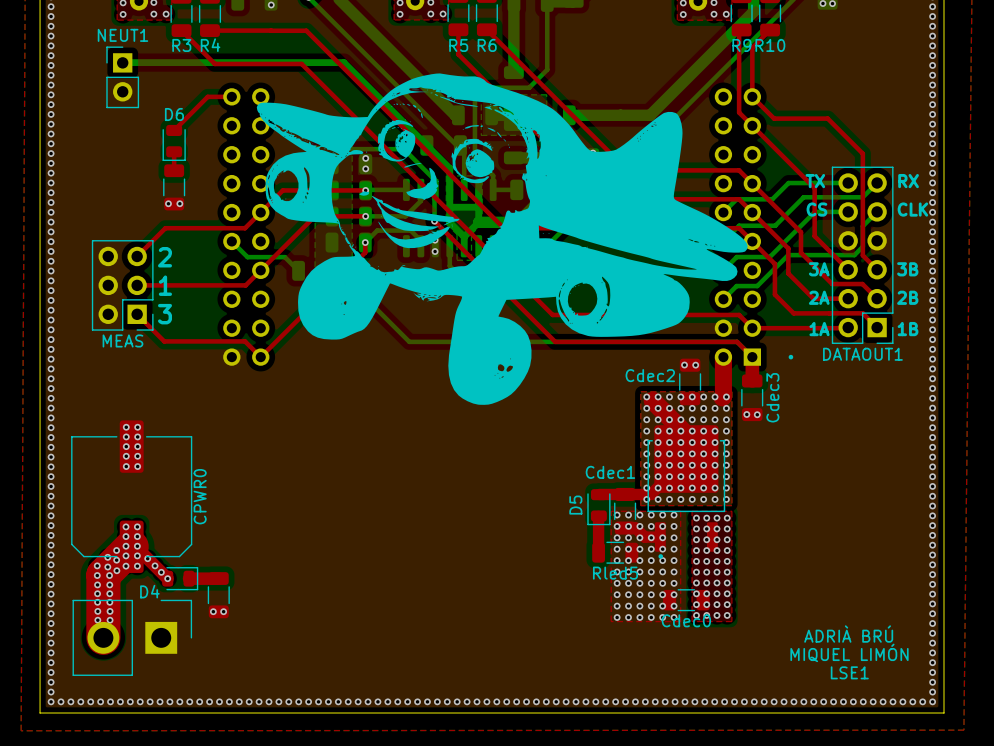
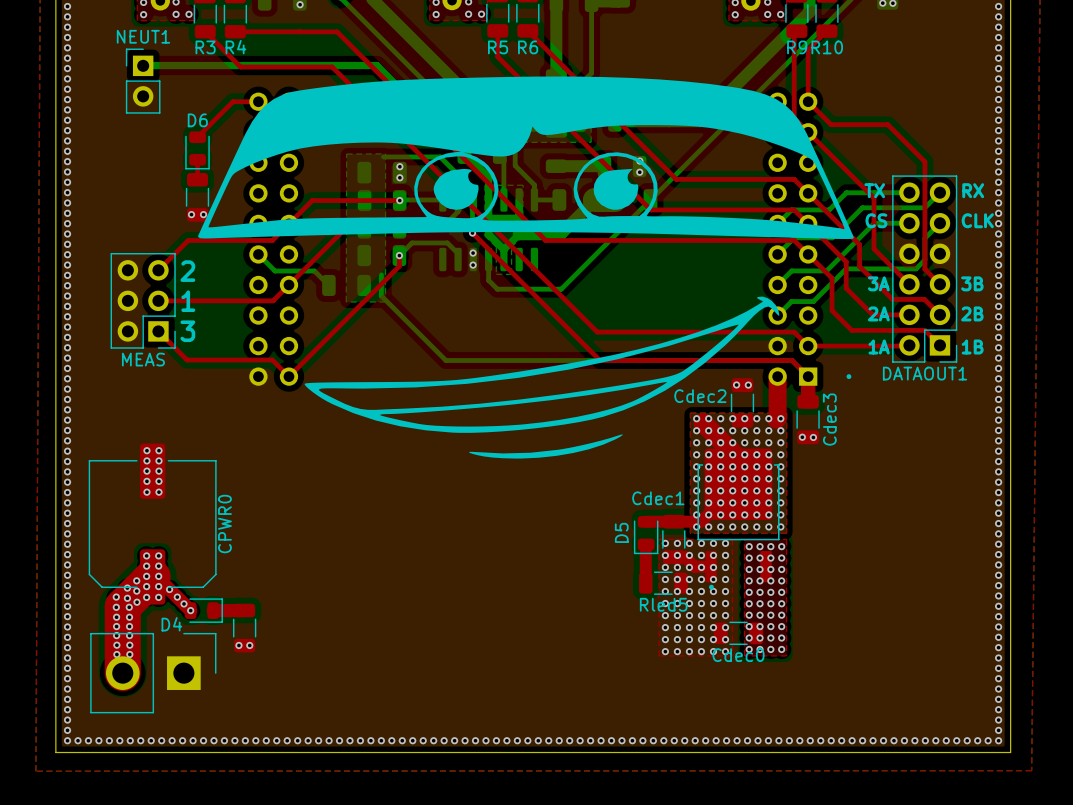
drawing: none -> [198, 76, 854, 459]
drawing: [256, 73, 748, 405] -> none
text: ADRIÀ BRÚ (848, 634) -> none
text: MIQUEL LIMÓN (849, 652) -> none
text: LSE1 (849, 672) -> none

